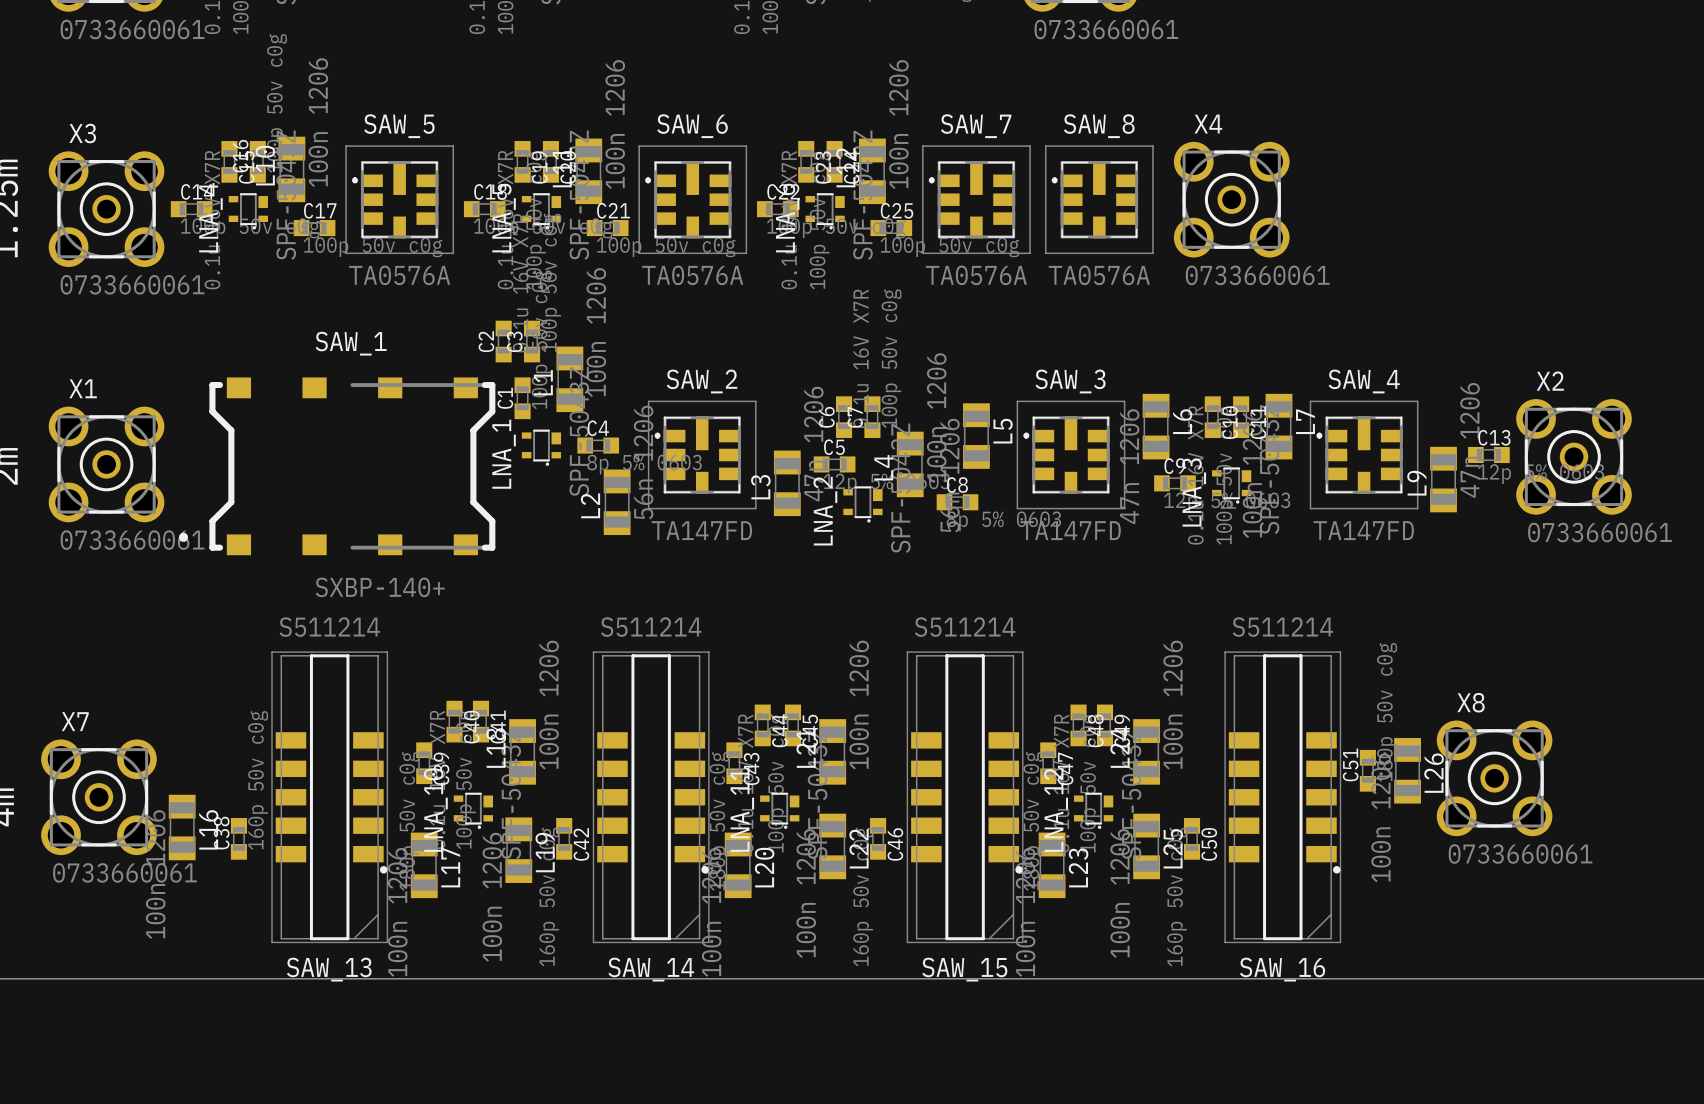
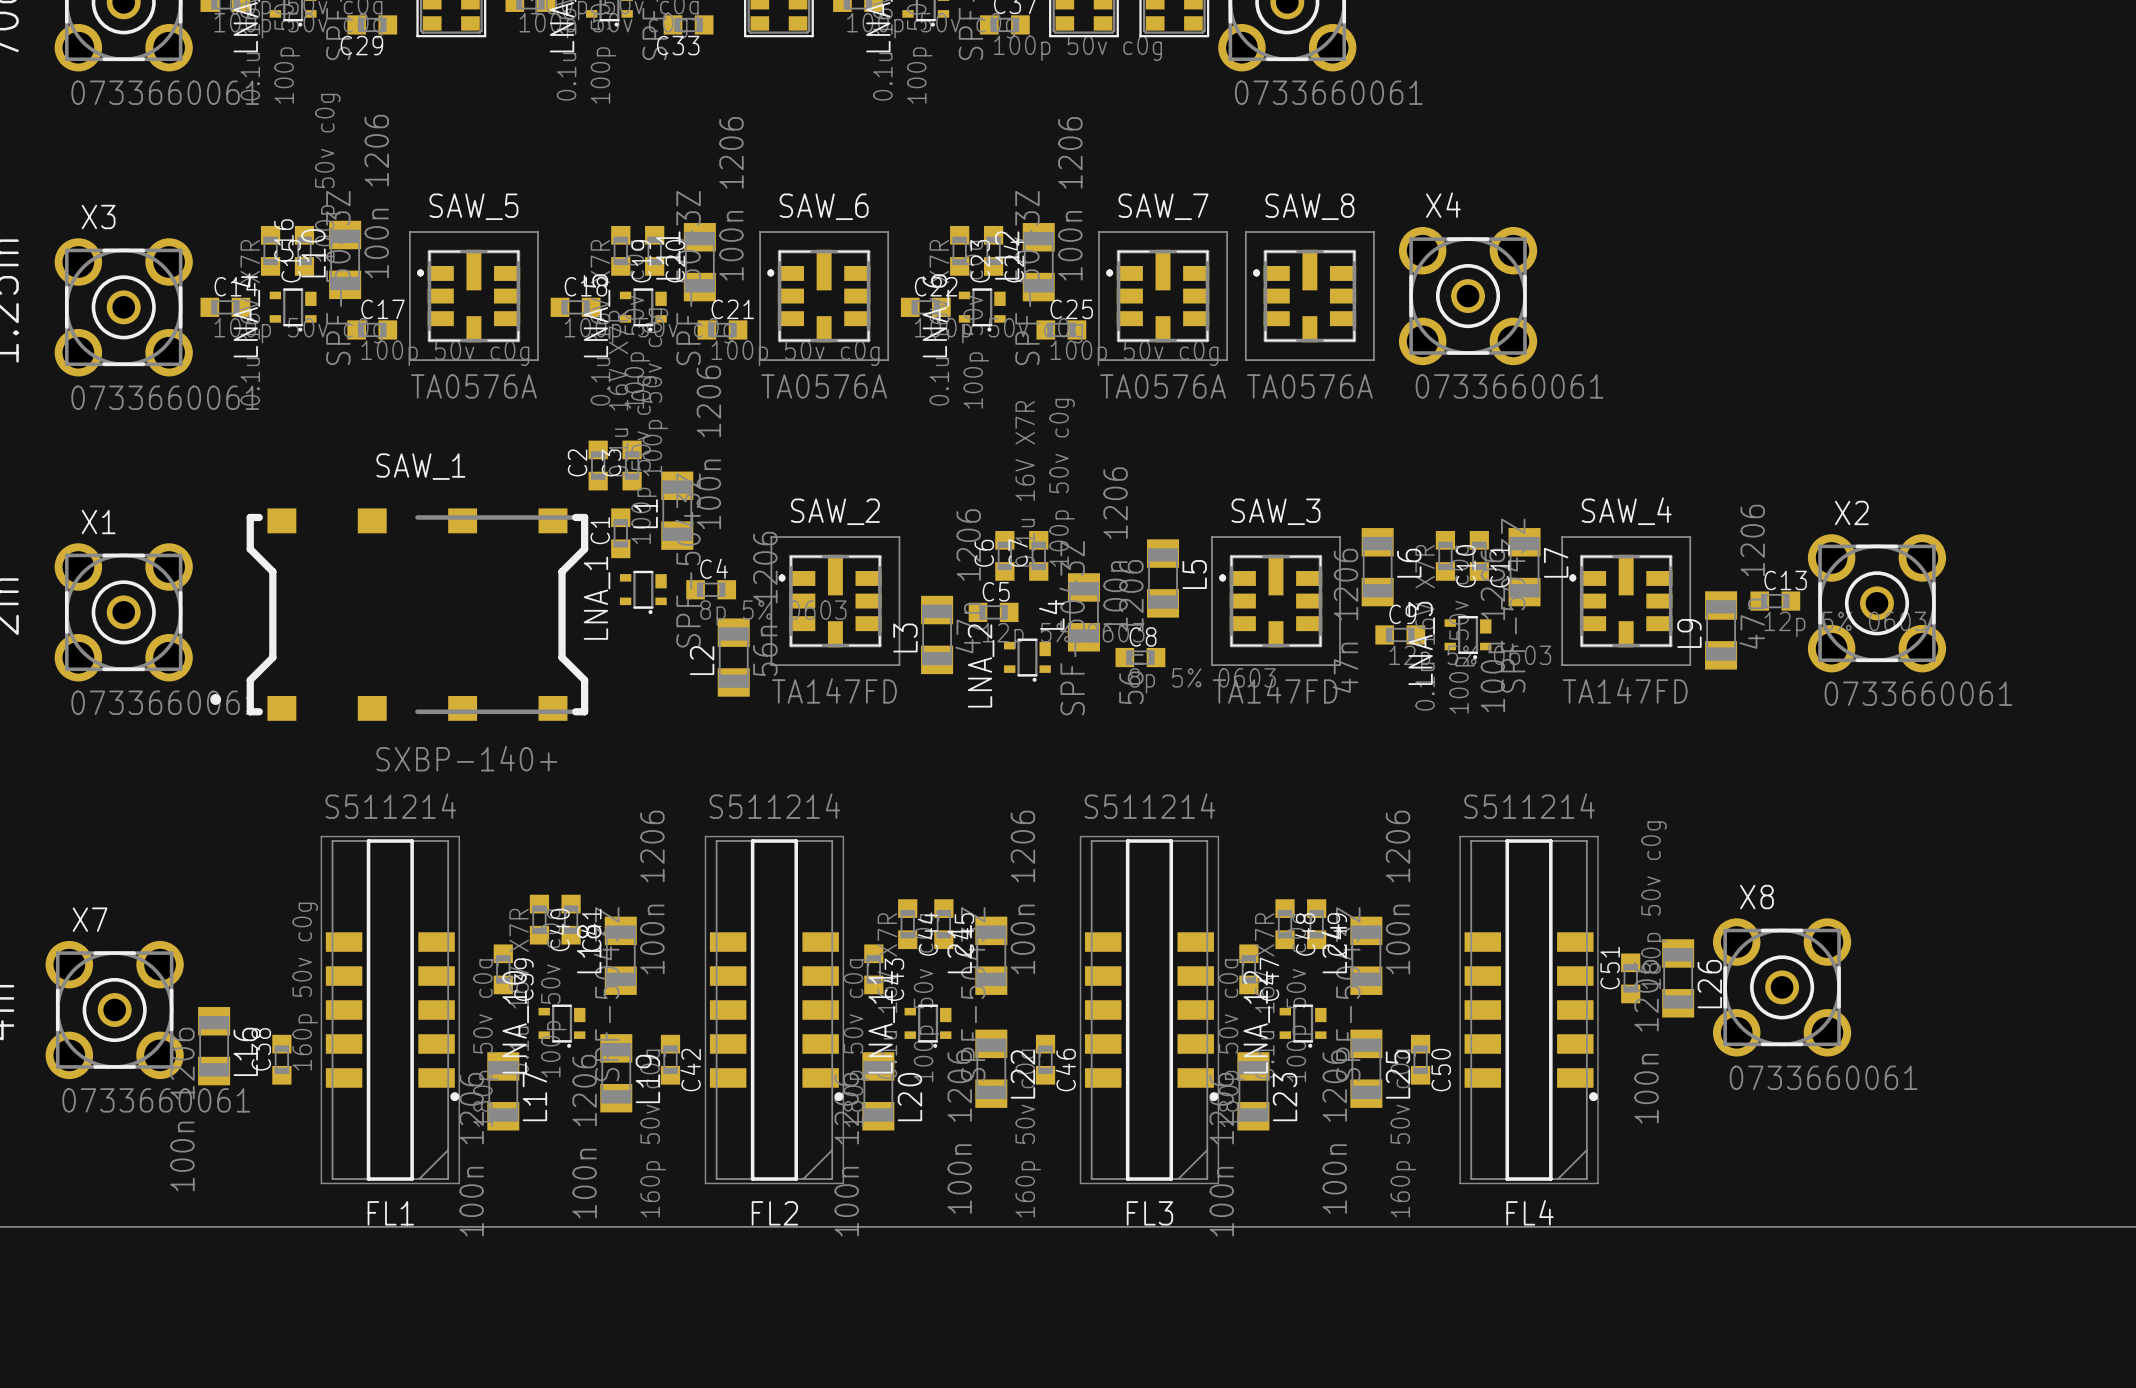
SAW_13 name: SAW_13 (329, 969) -> FL1 (390, 1213)
SAW_14 name: SAW_14 (651, 969) -> FL2 (774, 1213)
SAW_15 name: SAW_15 (964, 969) -> FL3 (1149, 1213)
SAW_16 name: SAW_16 (1282, 969) -> FL4 (1530, 1212)

